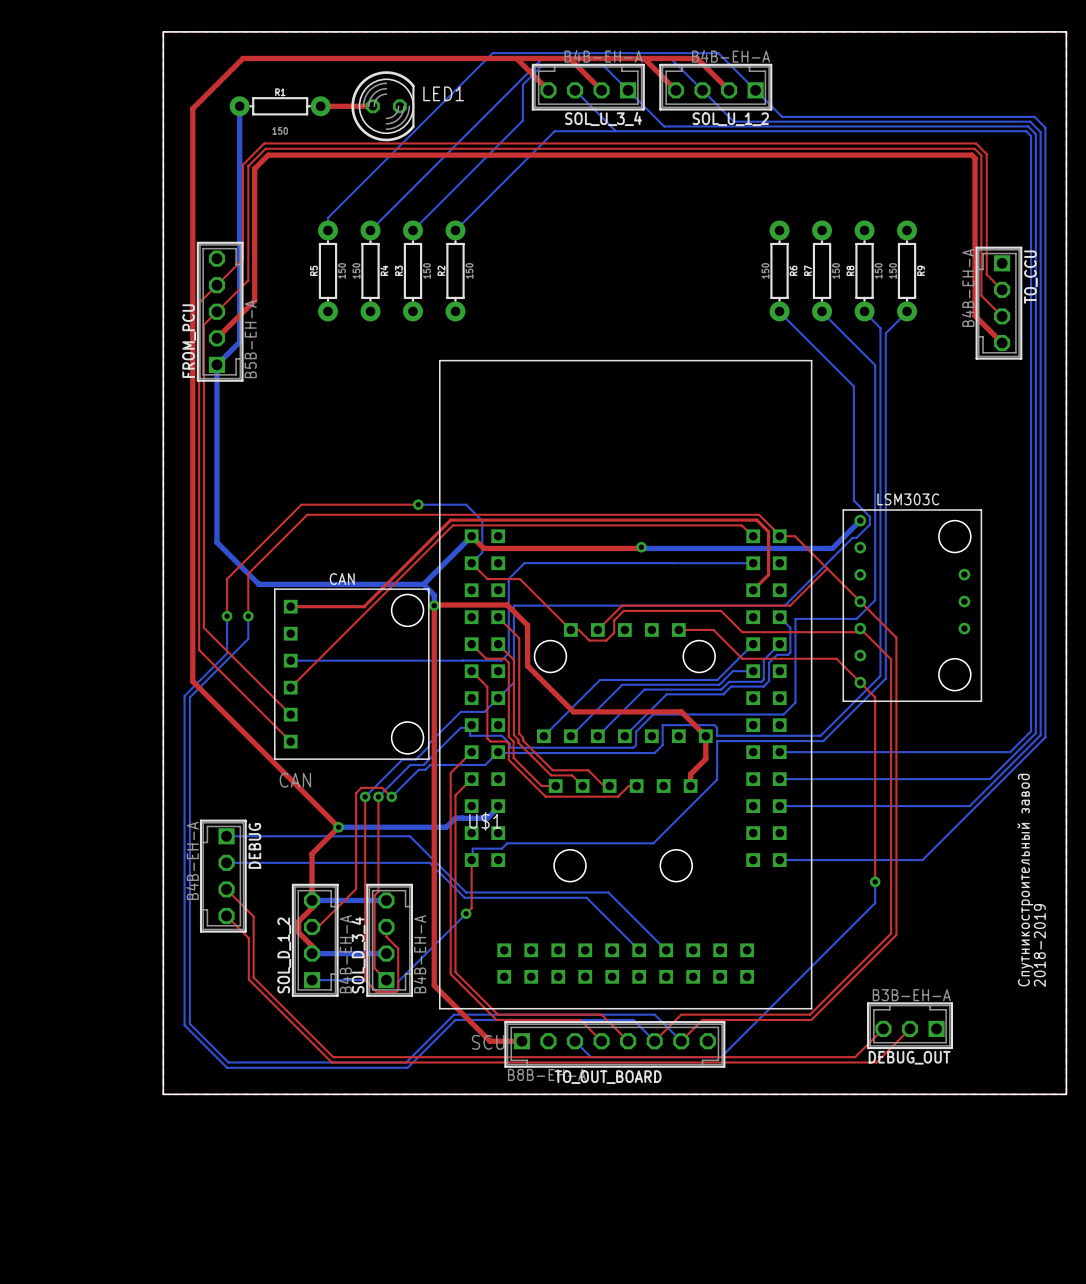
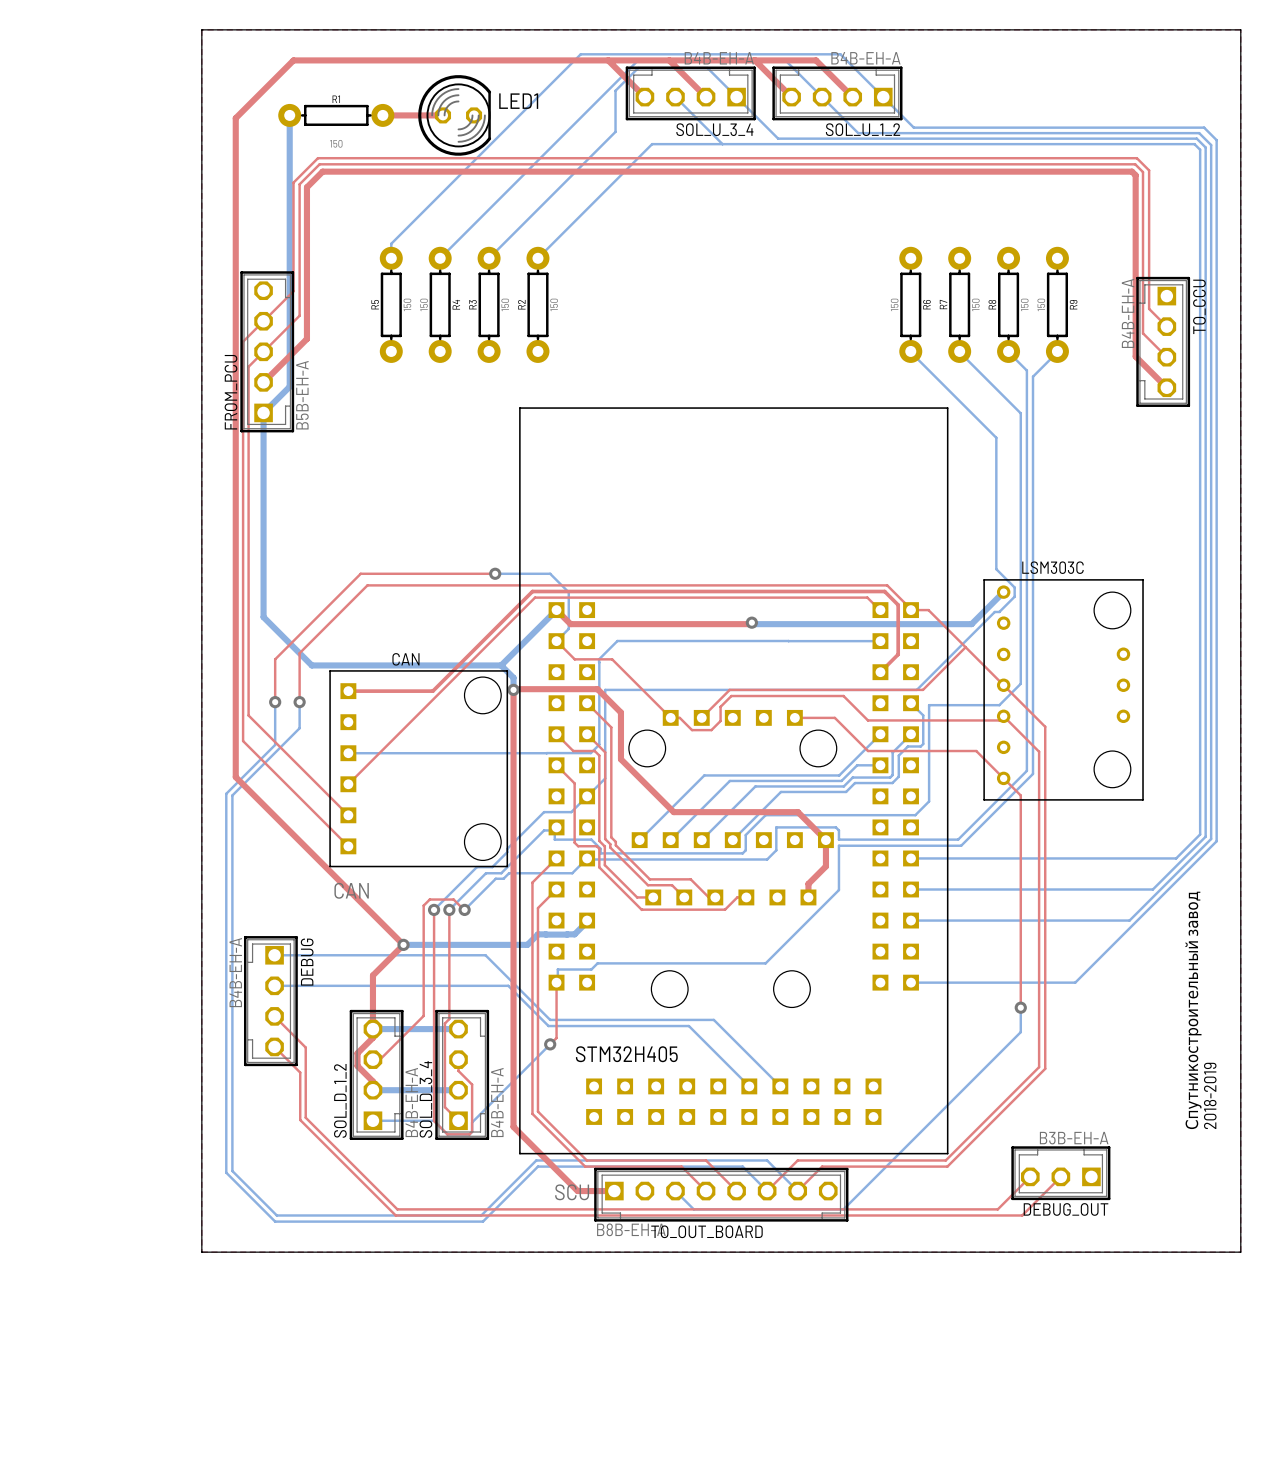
U$1 name: U$1 (485, 821) -> STM32H405 (626, 1054)

